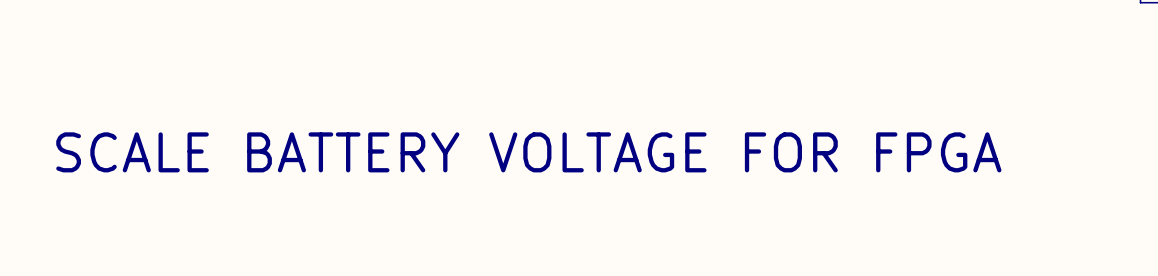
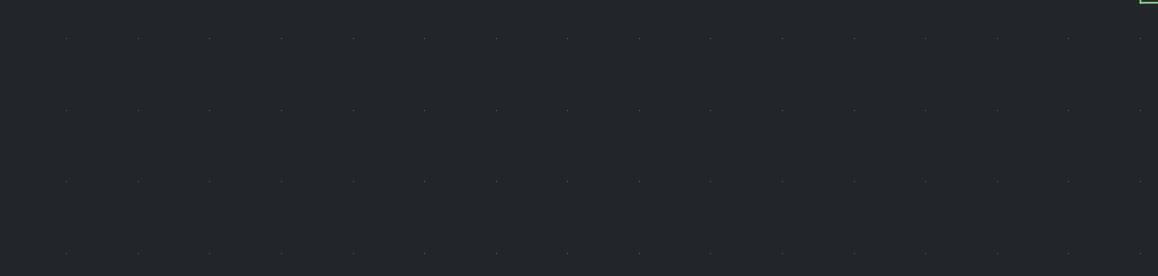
text: SCALE BATTERY VOLTAGE FOR FPGA (528, 152) -> none

